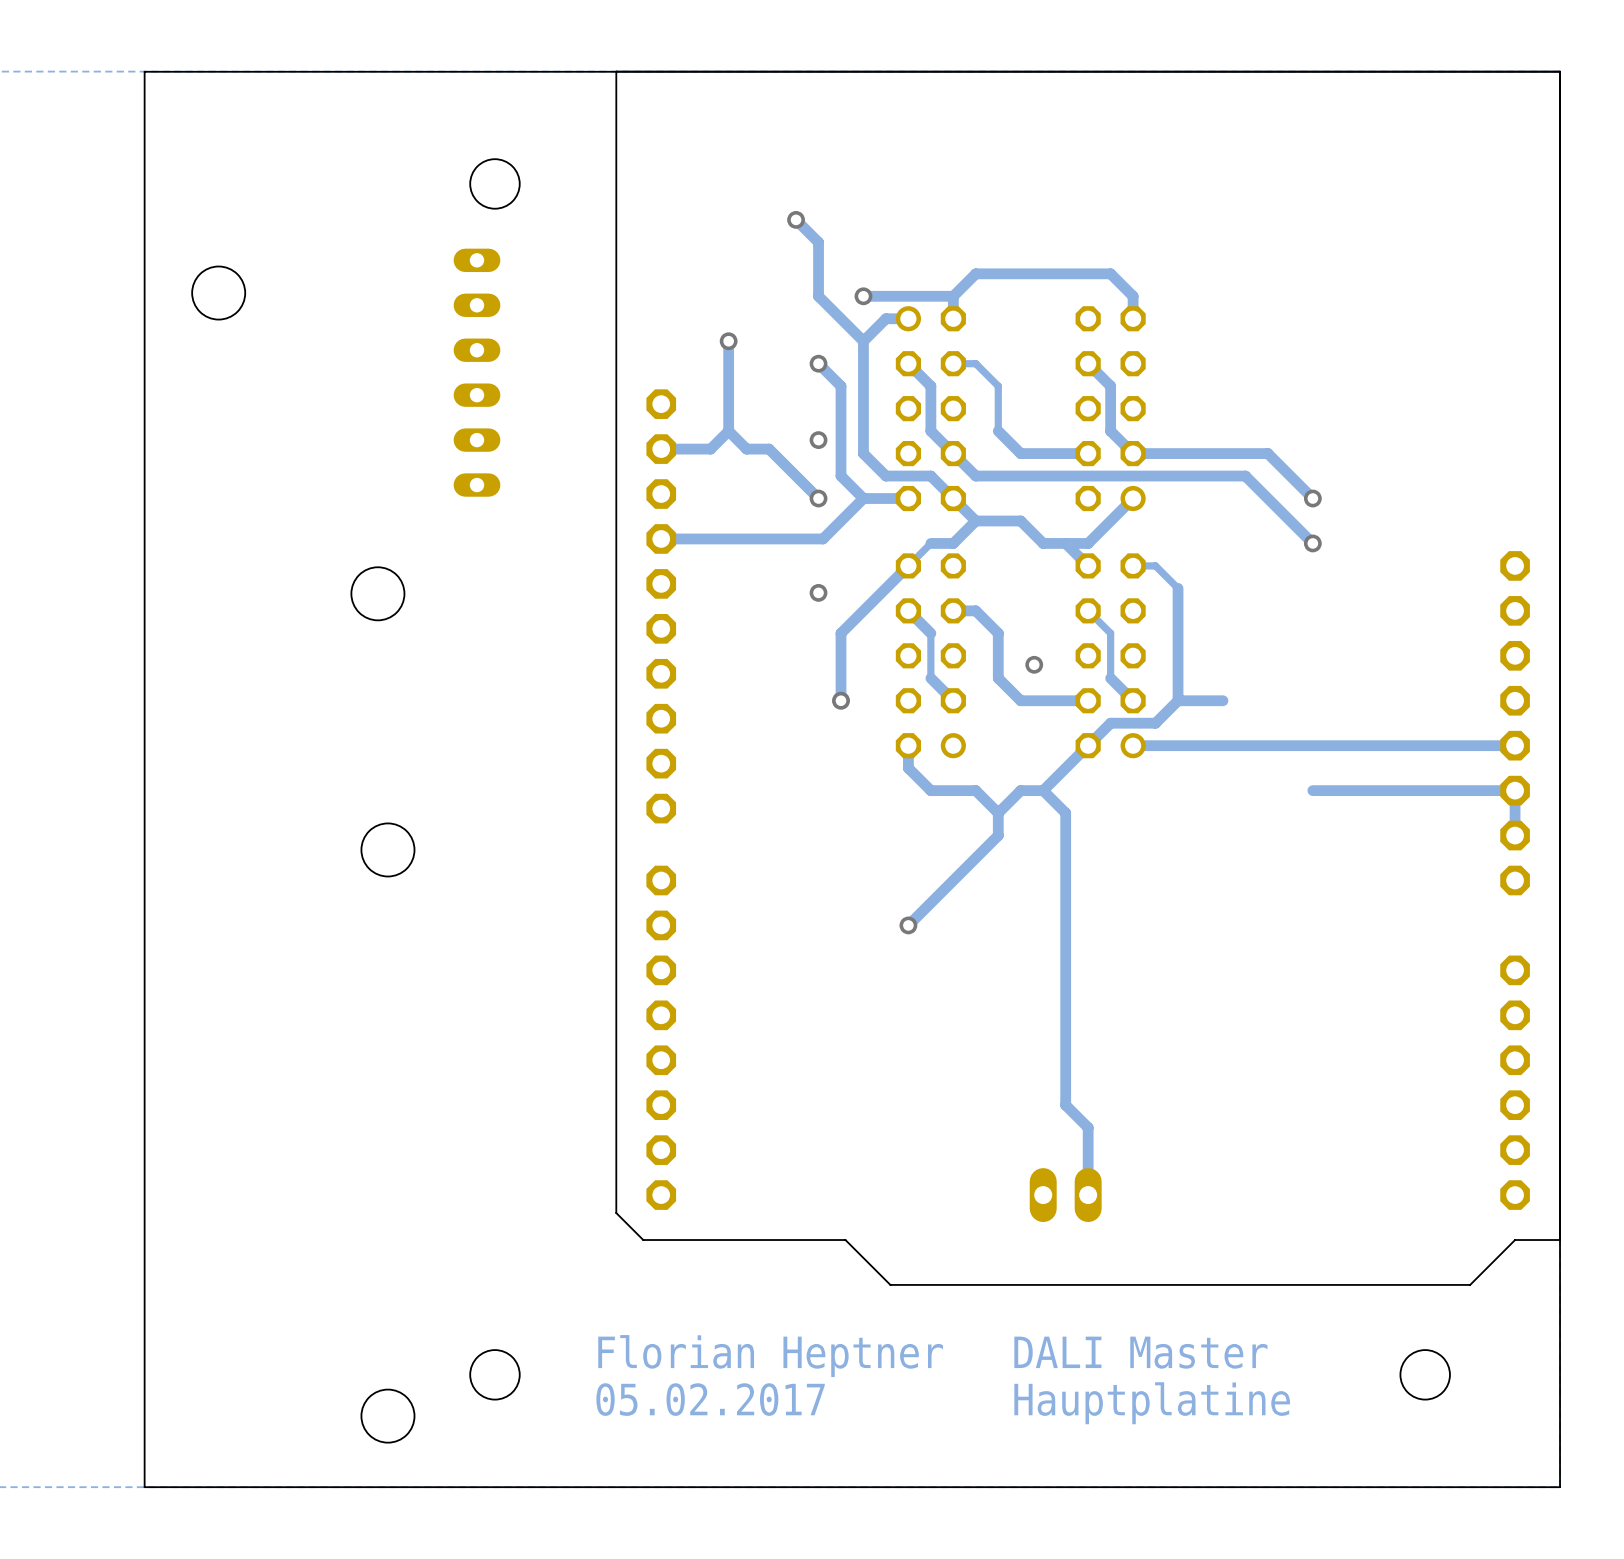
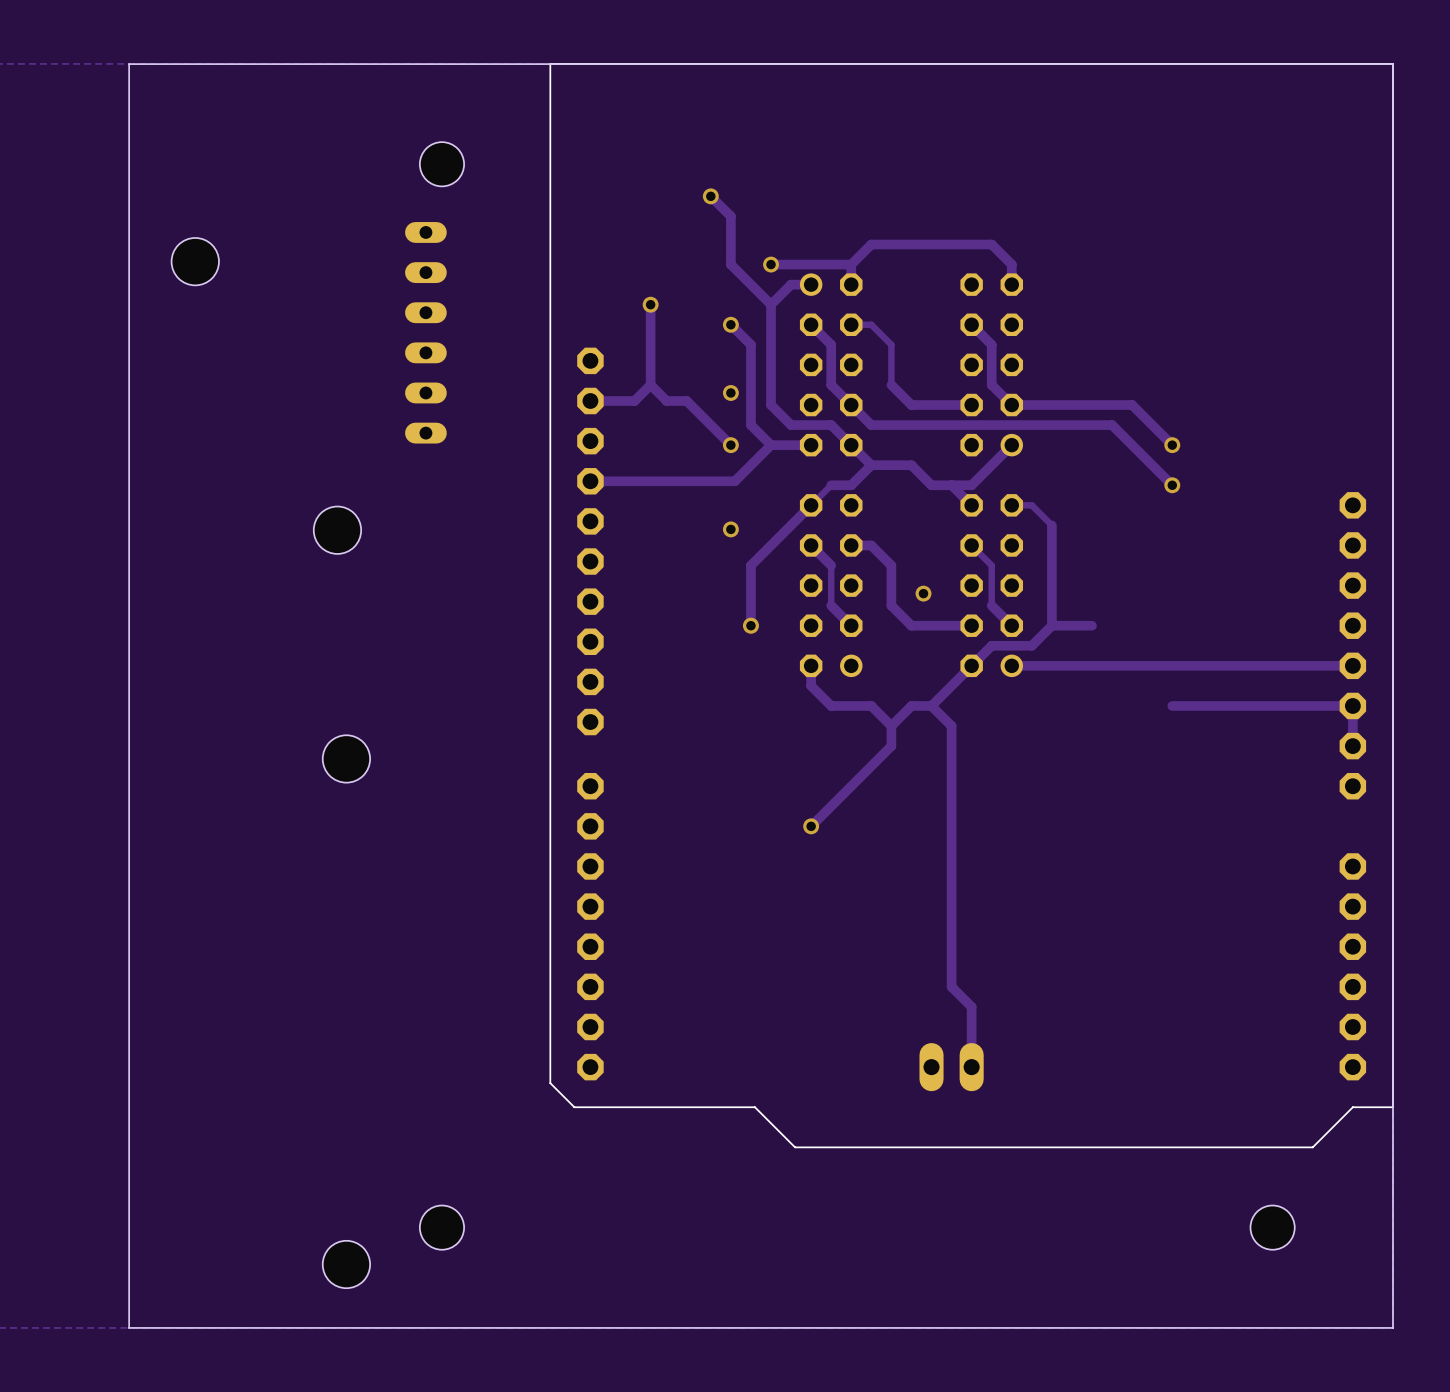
text: DALI Master (1140, 1352) -> none
text: Florian Heptner (770, 1356) -> none
text: 05.02.2017 (710, 1399) -> none
text: Hauptplatine (1152, 1403) -> none

